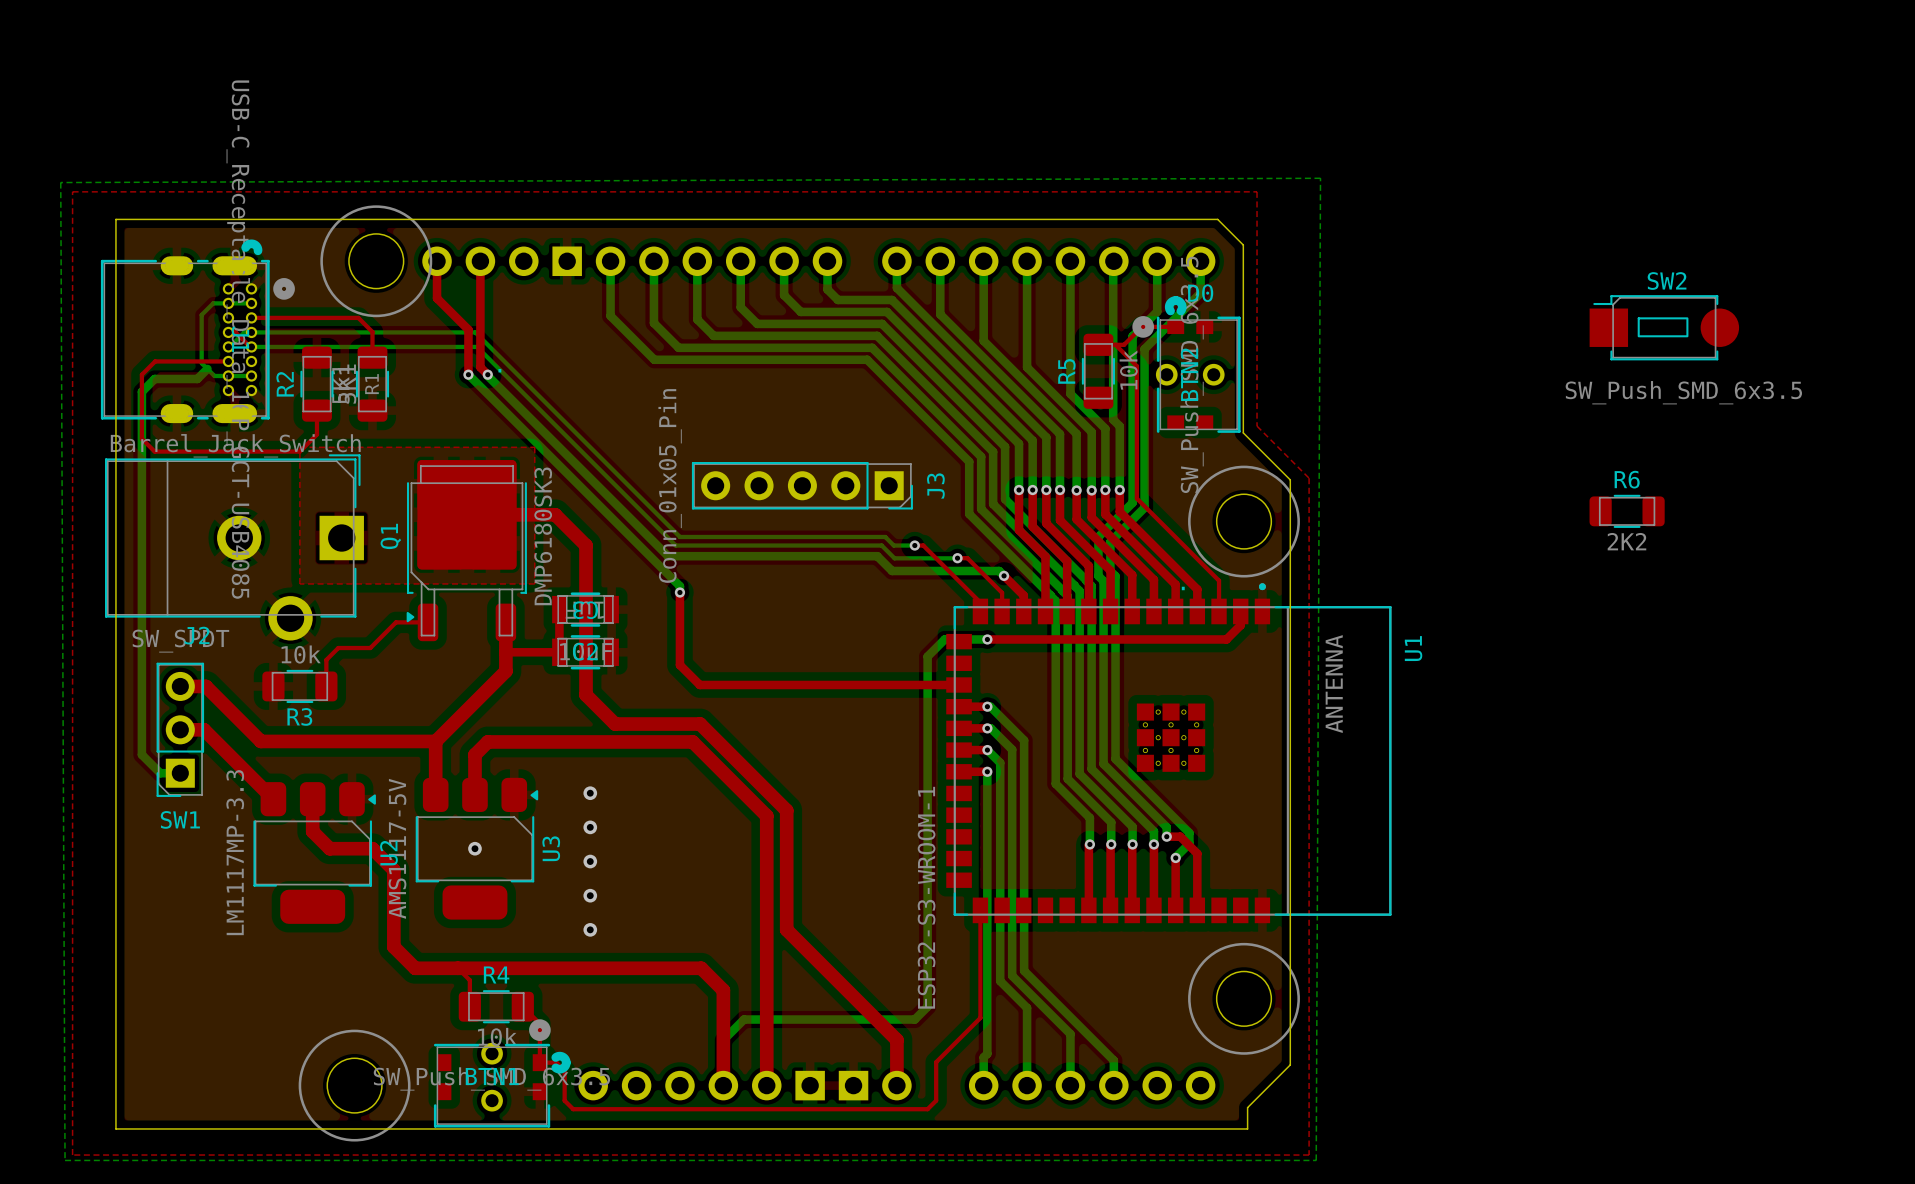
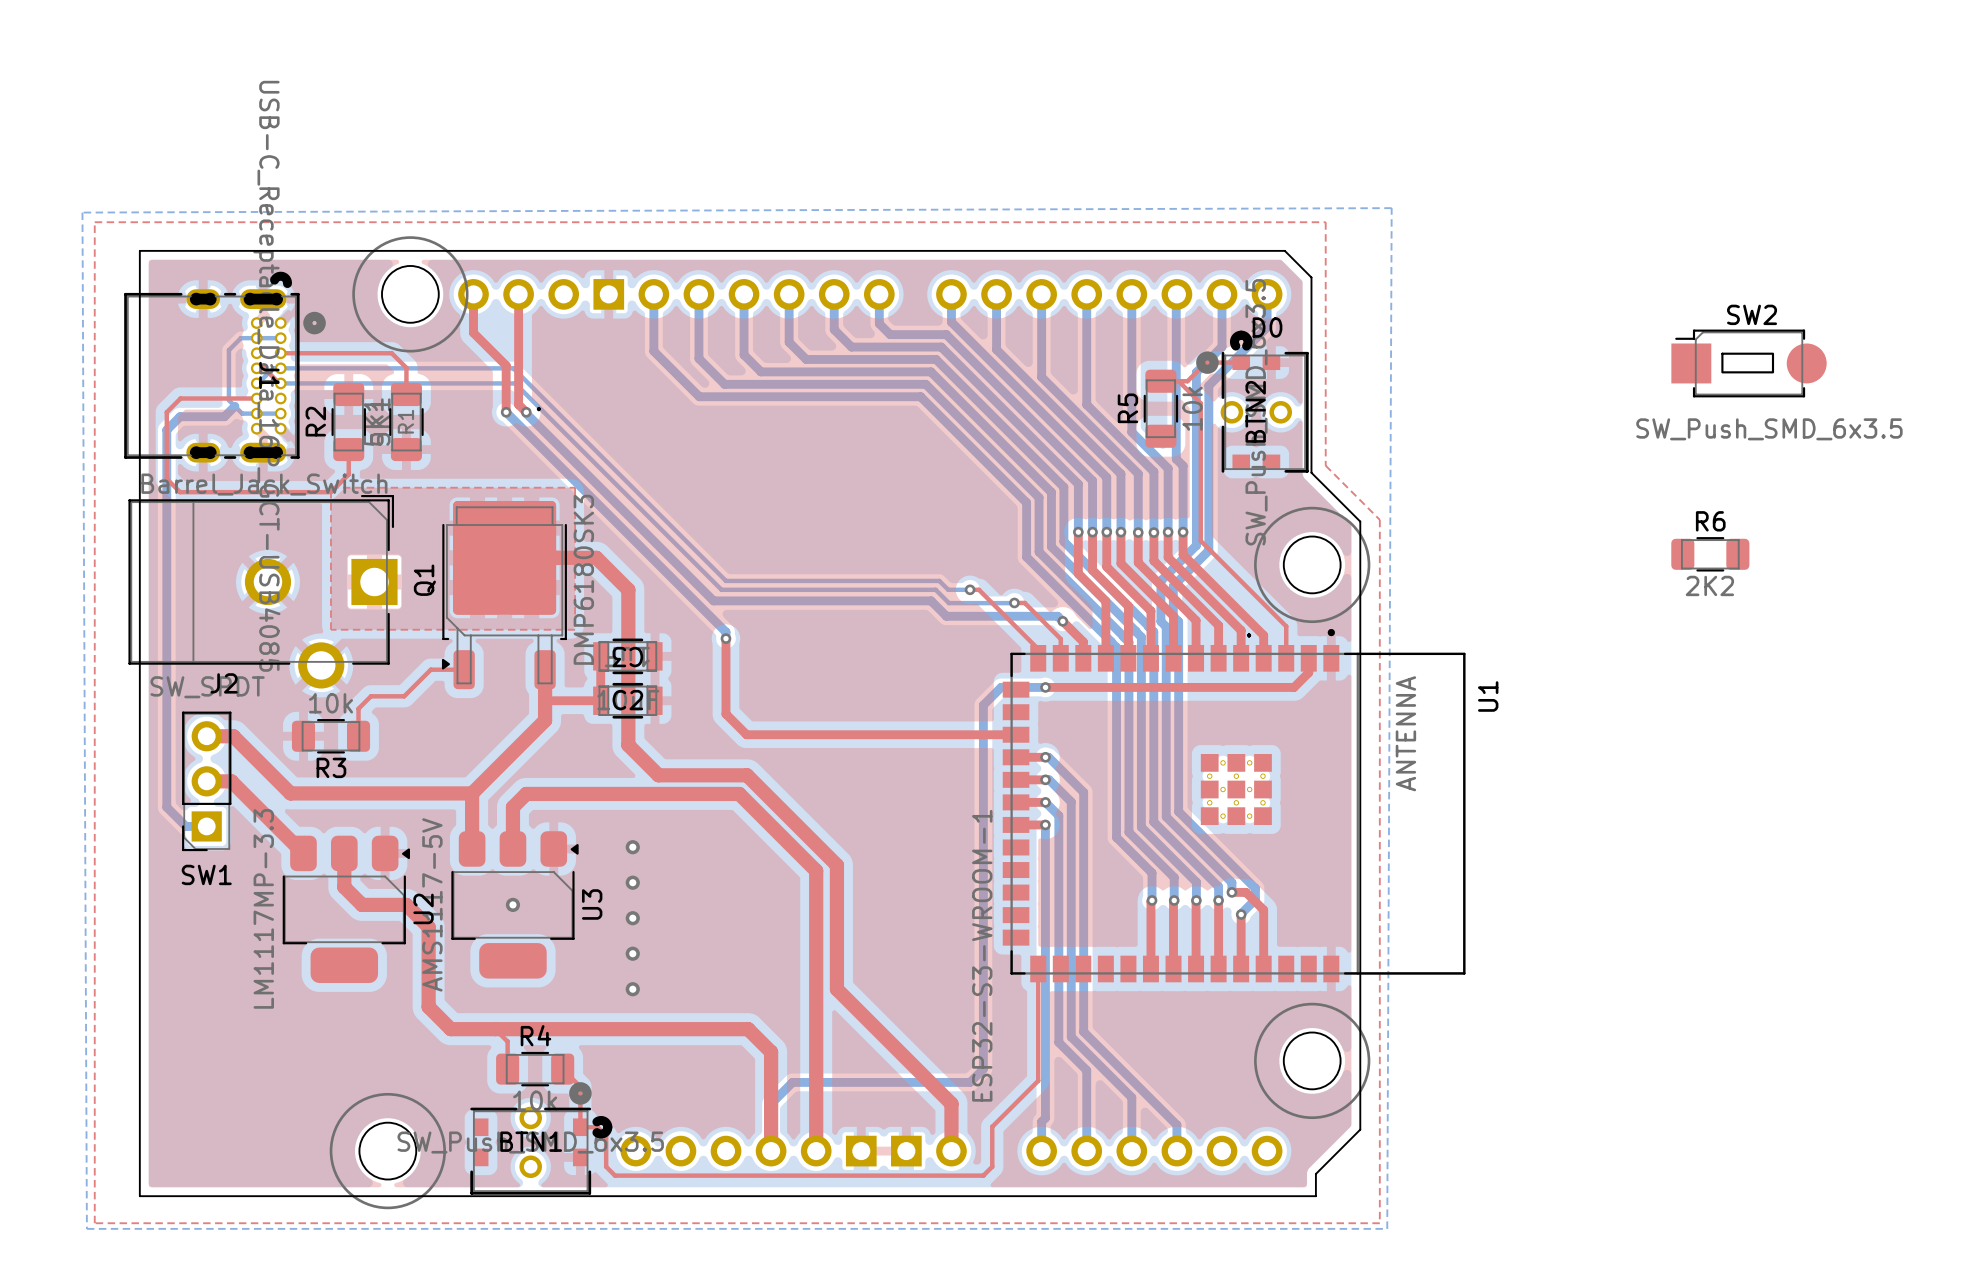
J3: Conn_01x05_Pin (802, 485) -> none

